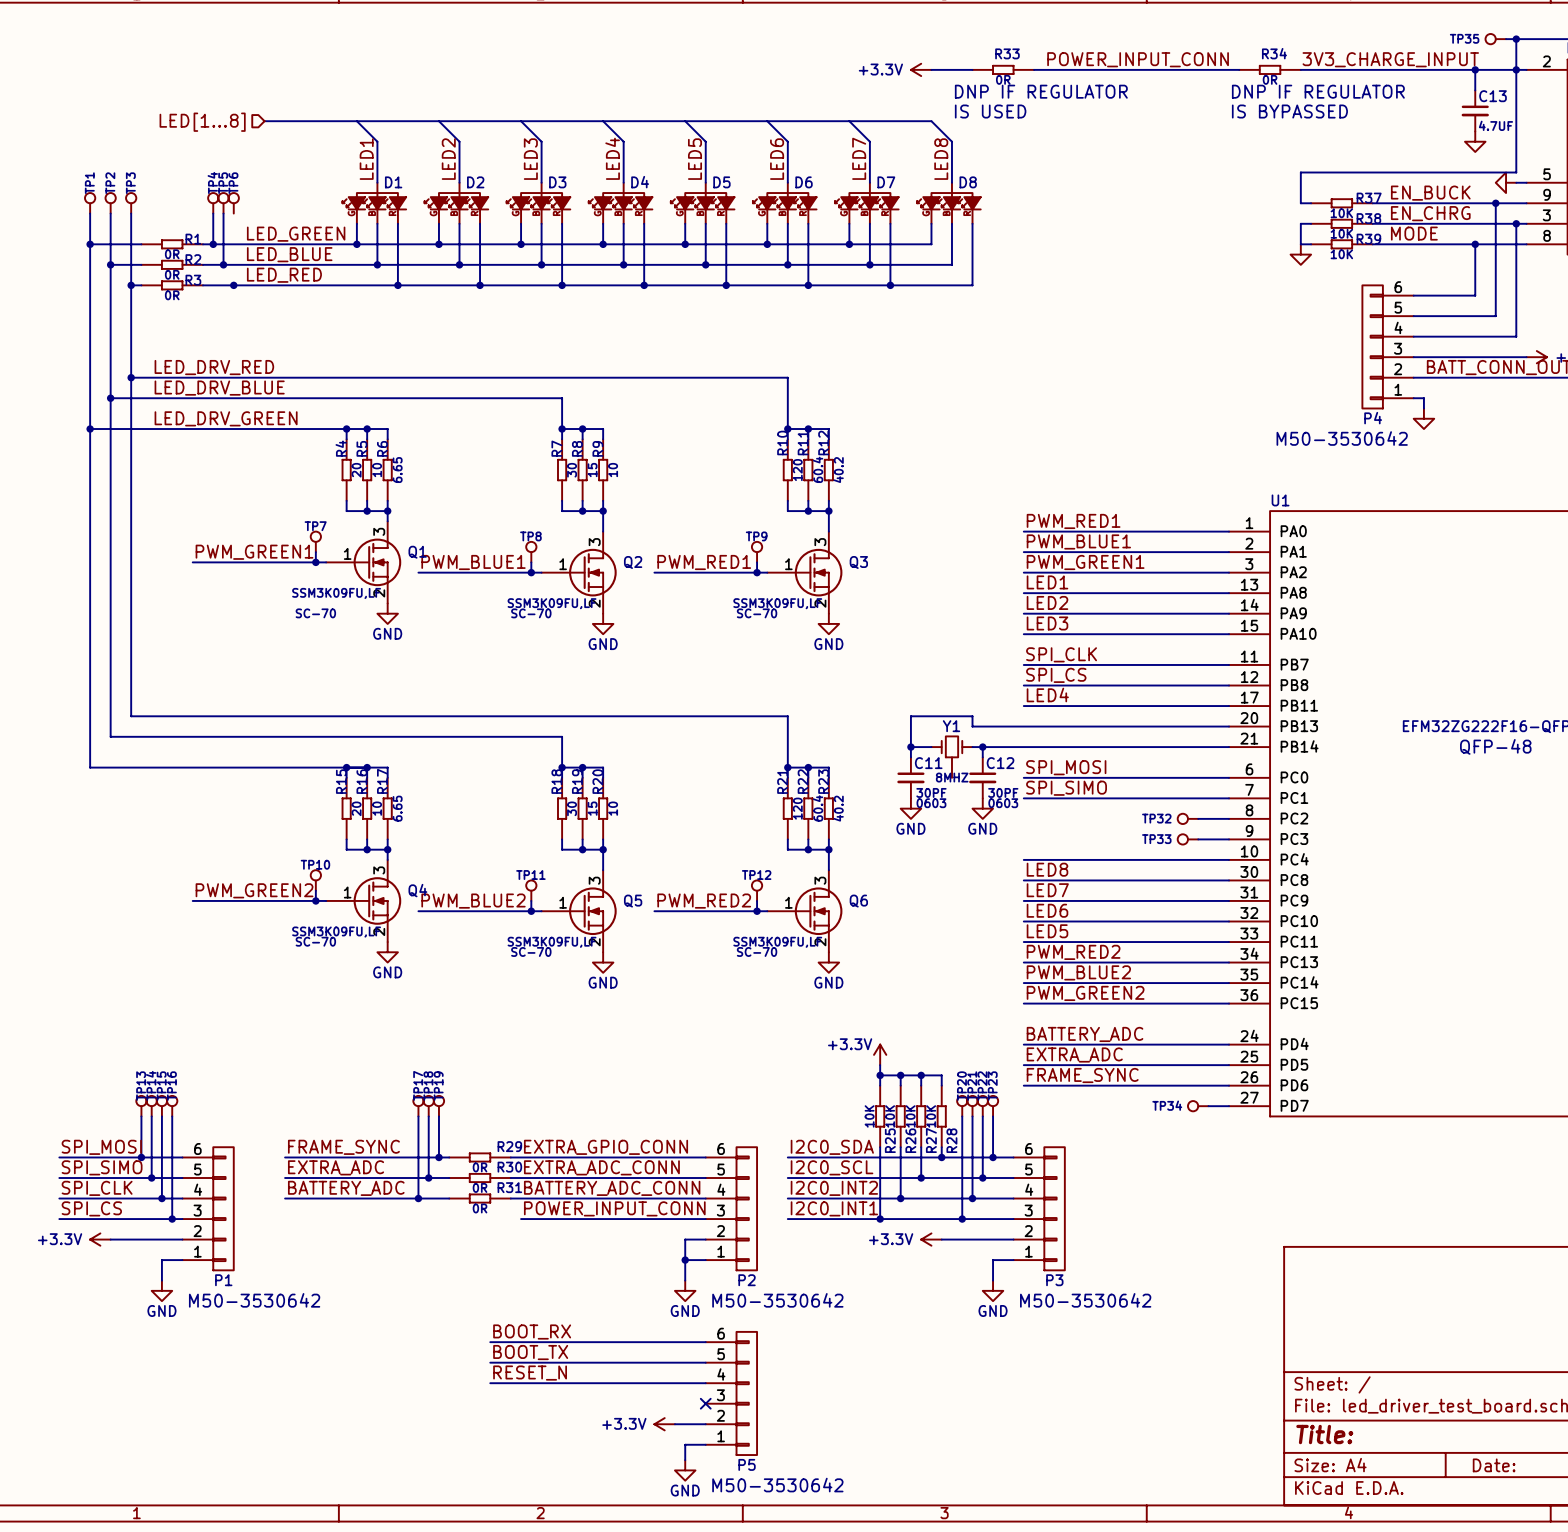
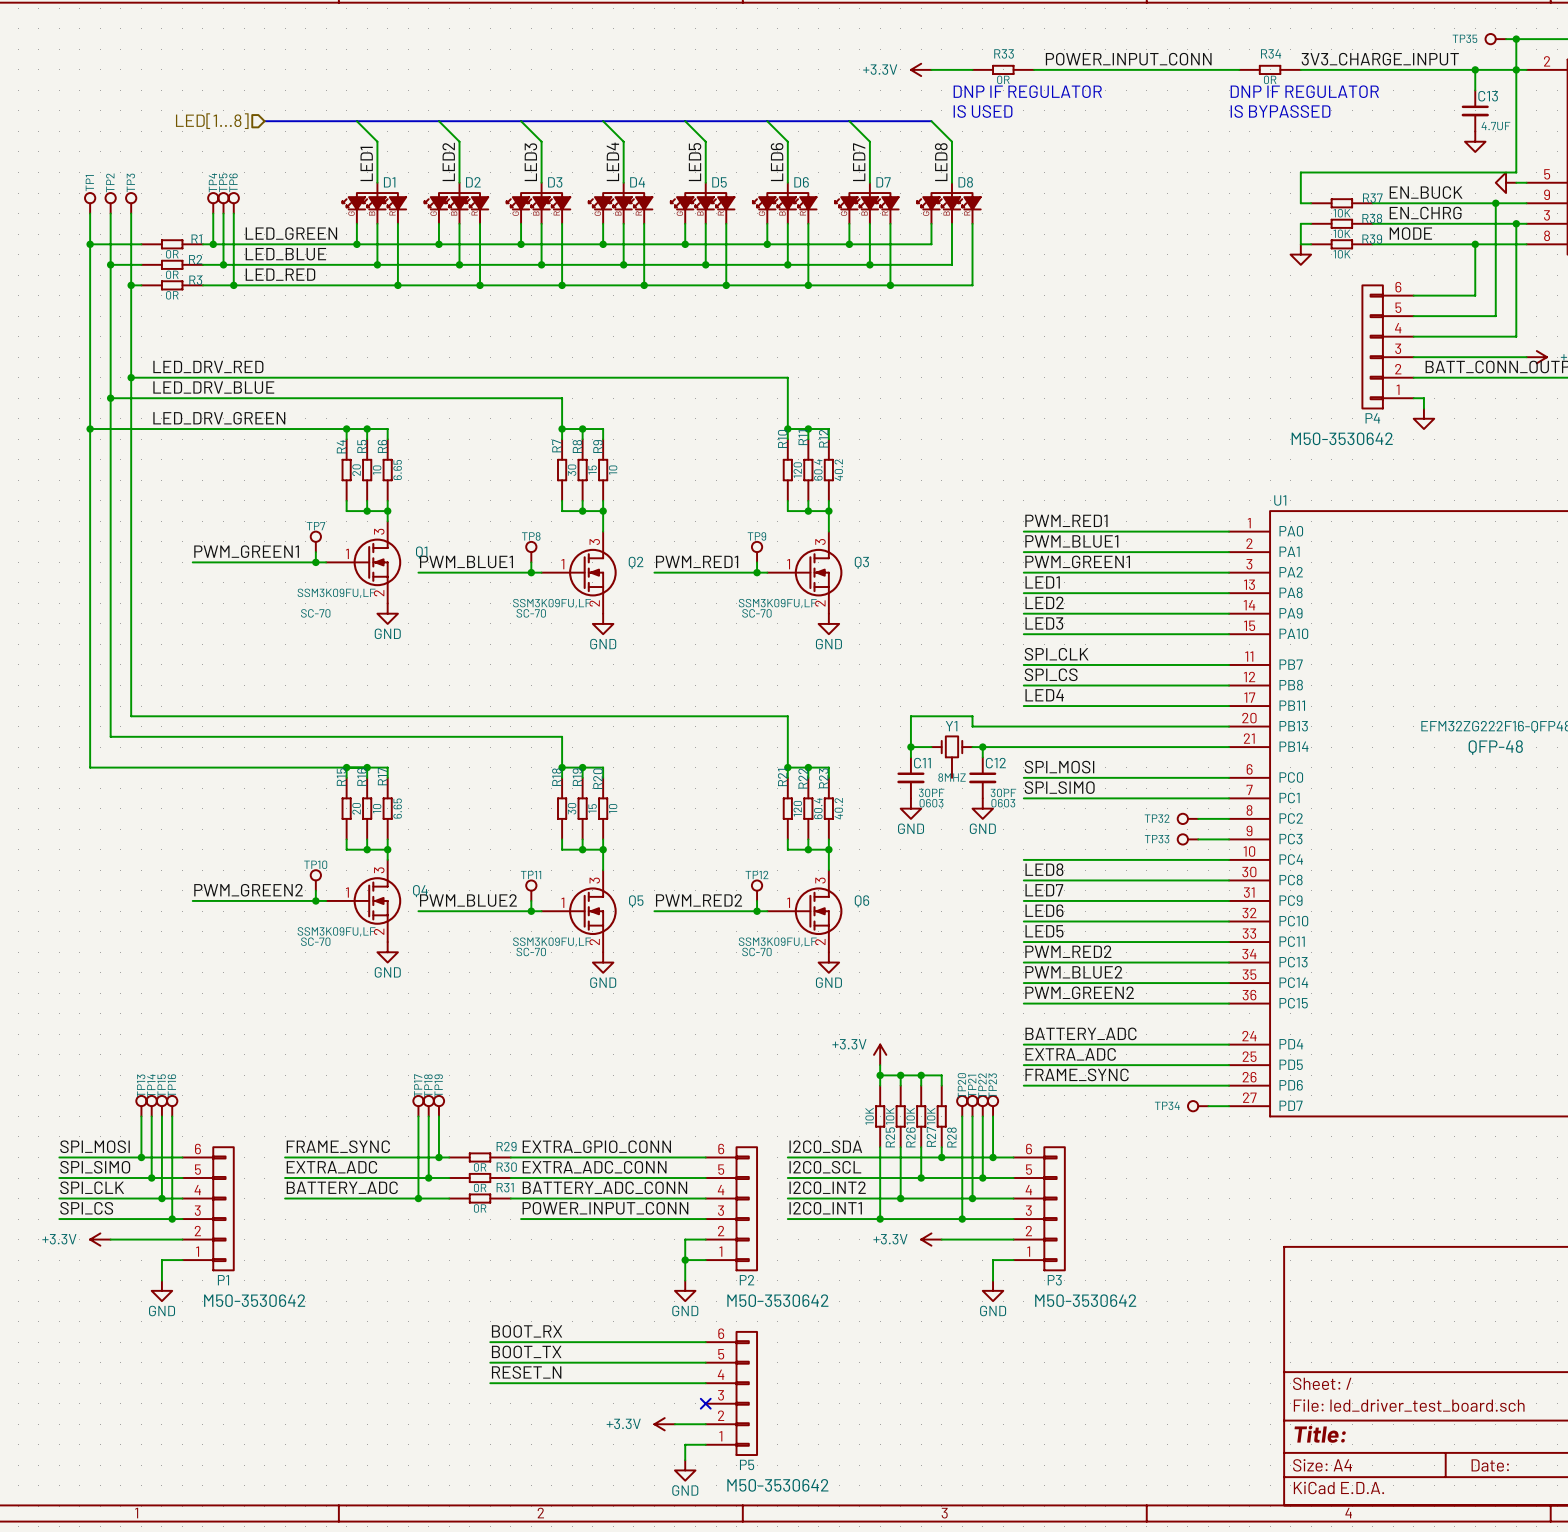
wire: none -> (233, 213) (233, 285)

